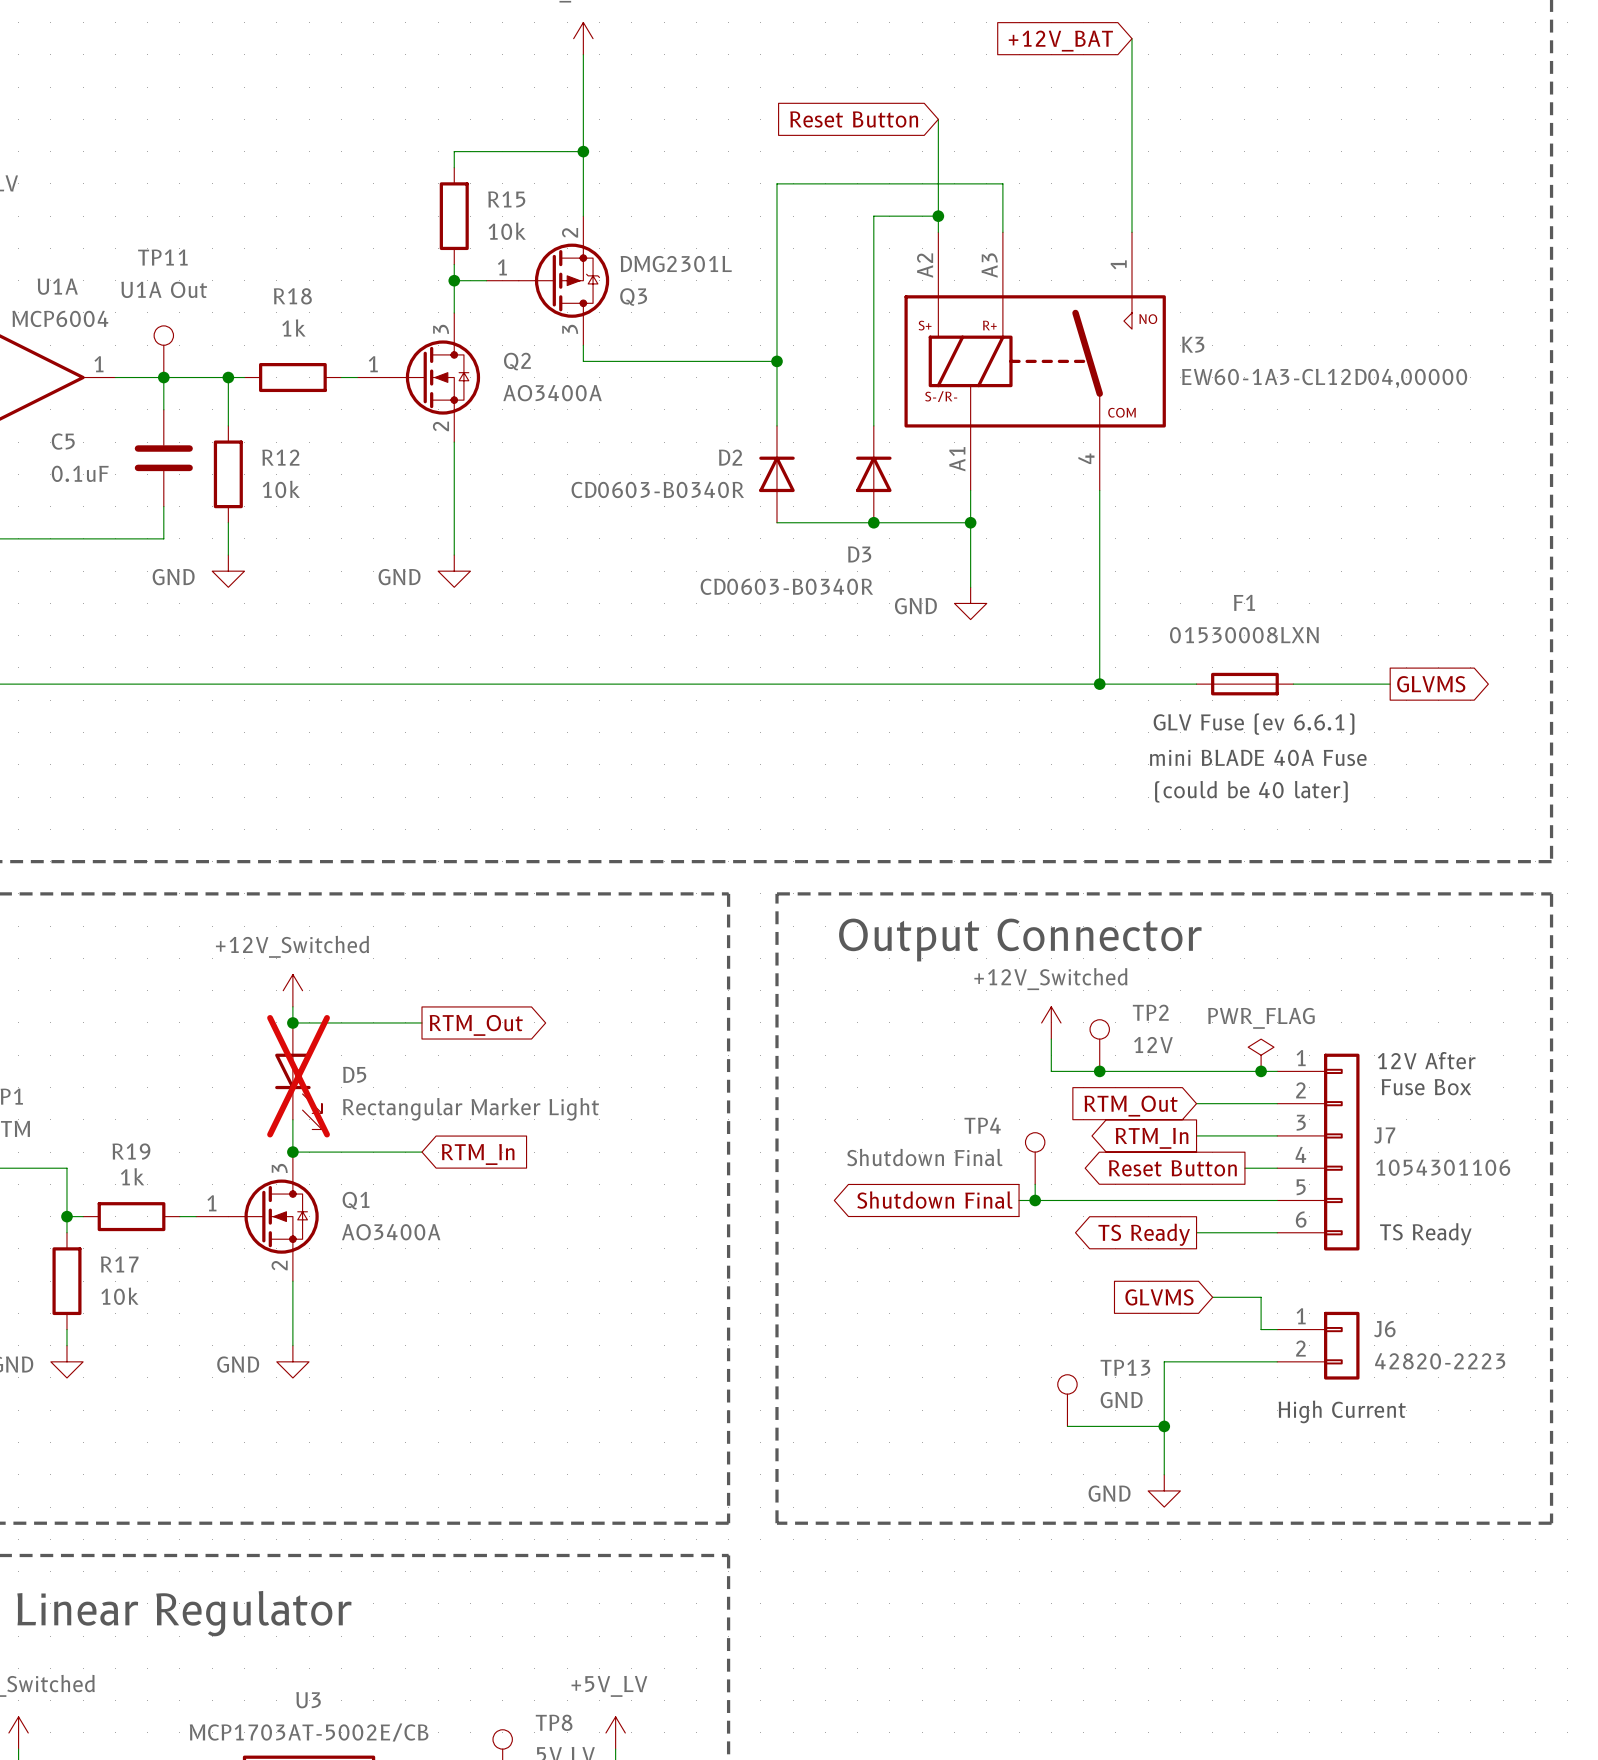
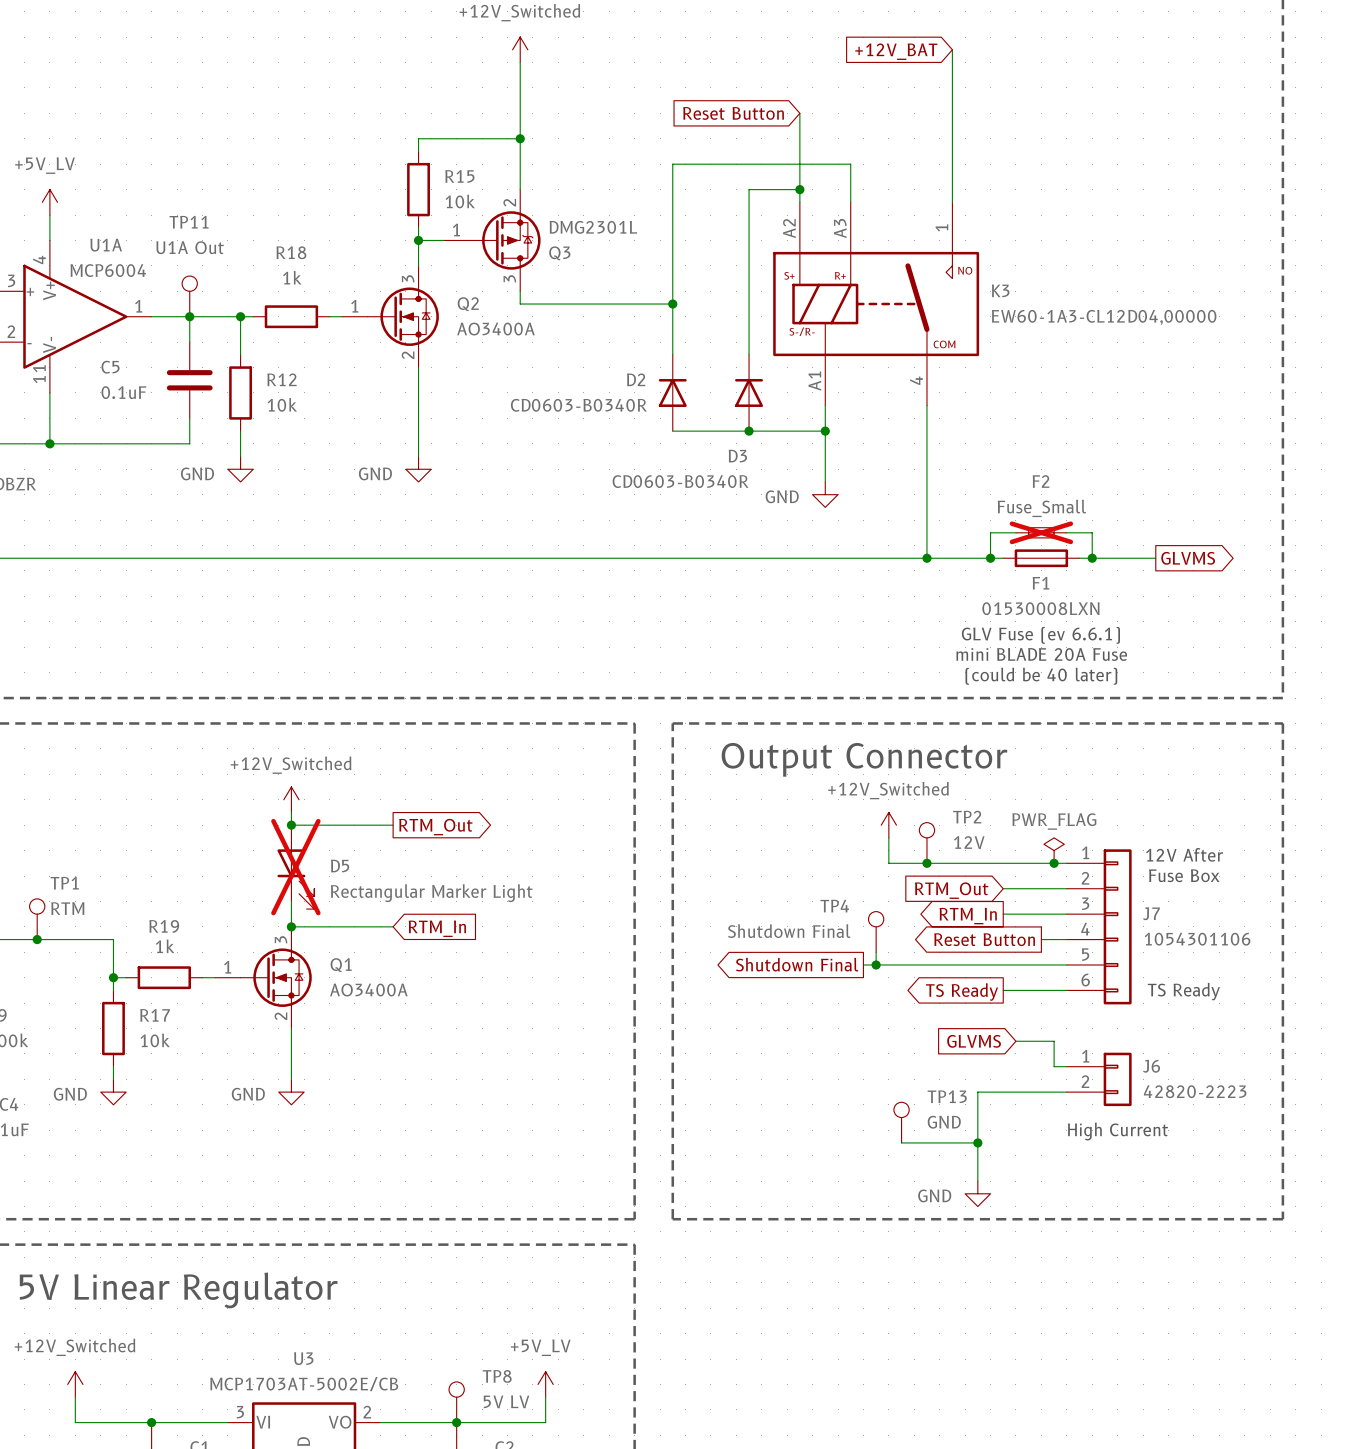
F1 name position: F1 (1244, 602) -> F1 (1041, 583)
F1 value position: 01530008LXN (1244, 635) -> 01530008LXN (1040, 608)
wire: none -> (1015, 532) (990, 532) (990, 558)
F2: none -> Fuse_Small (1041, 532)
wire: none -> (1066, 532) (1092, 532) (1092, 558)
junction: none -> (990, 558)
junction: none -> (1092, 558)
text position: GLV Fuse (ev 6.6.1) (1254, 724) -> GLV Fuse (ev 6.6.1) (1040, 635)
text: mini BLADE 40A Fuse (1258, 757) -> none
text position: (could be 40 later) (1251, 791) -> (could be 40 later) (1041, 676)
text: none -> mini BLADE 20A Fuse (1041, 654)

